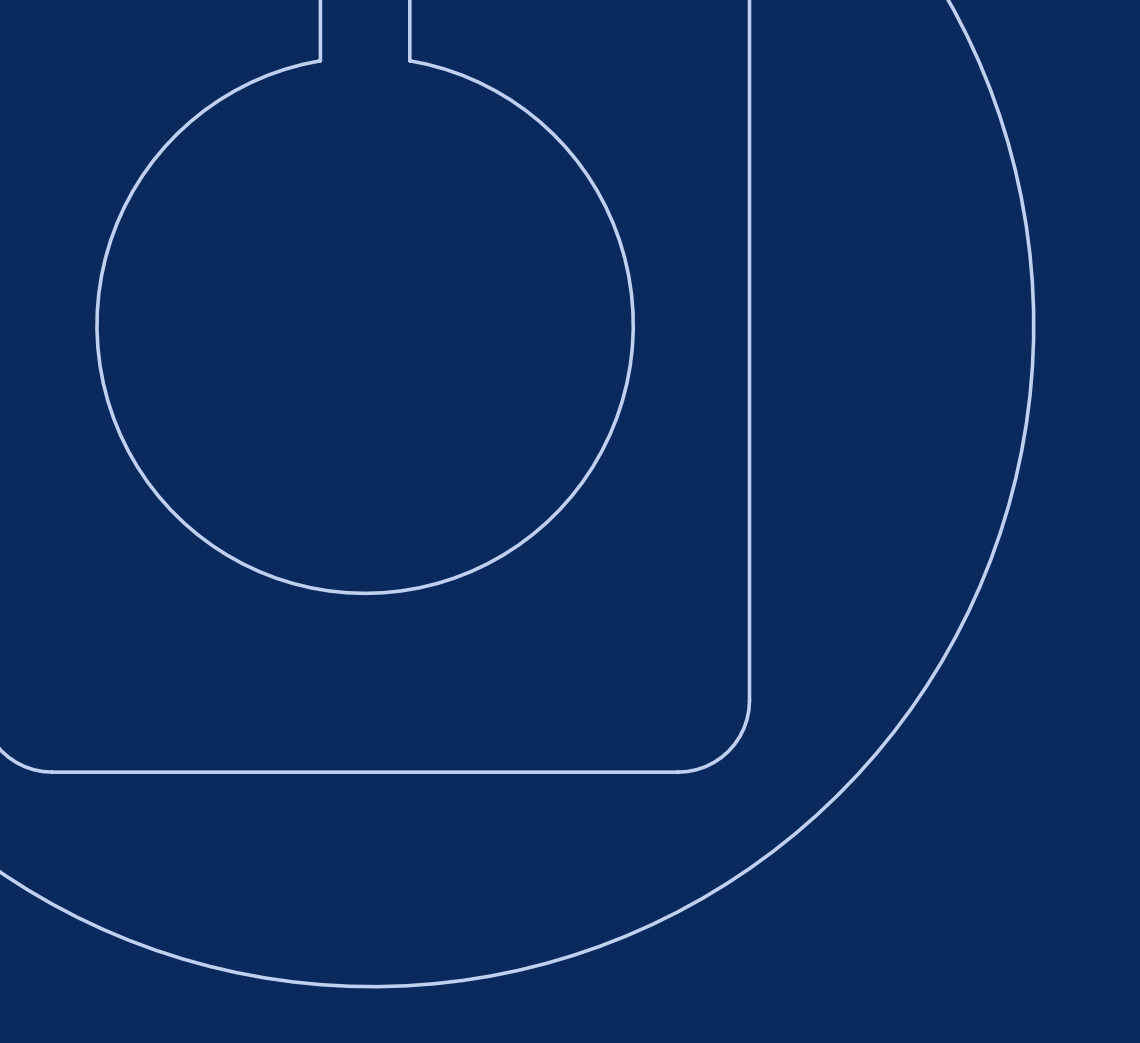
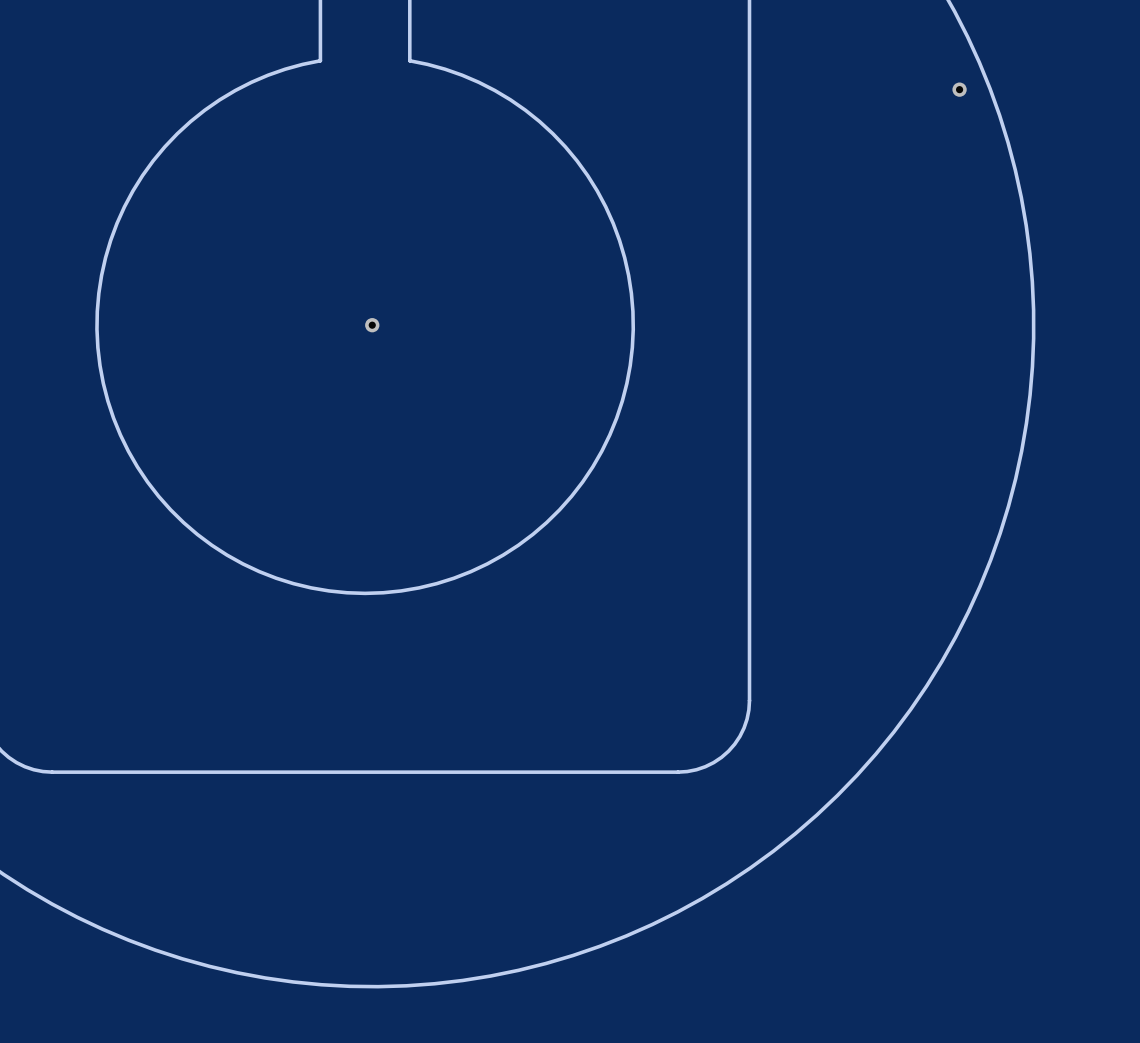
via: none -> (959, 89)
via: none -> (372, 325)

